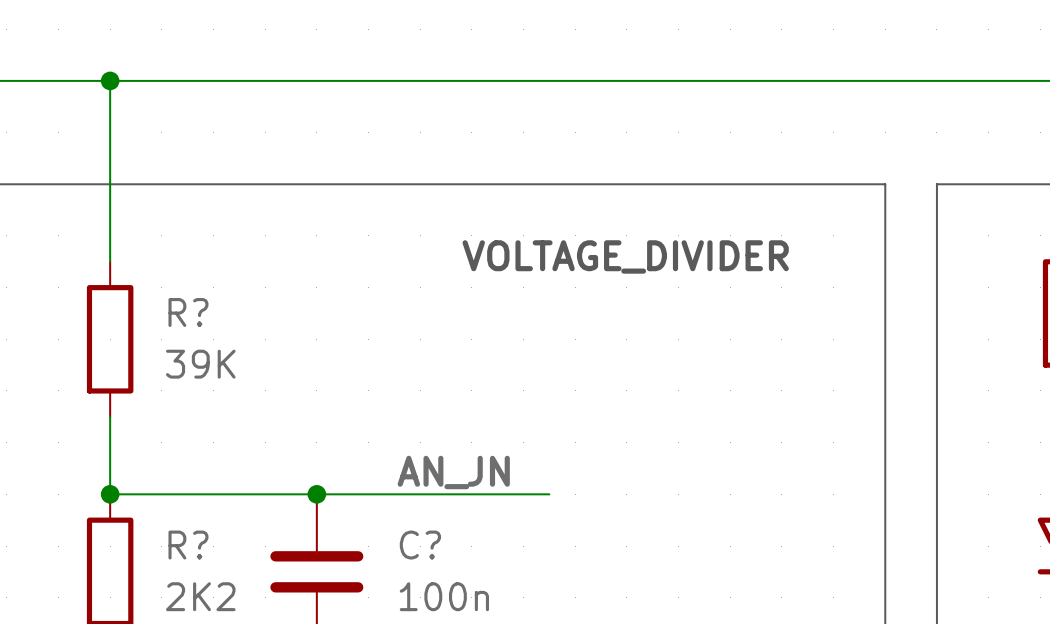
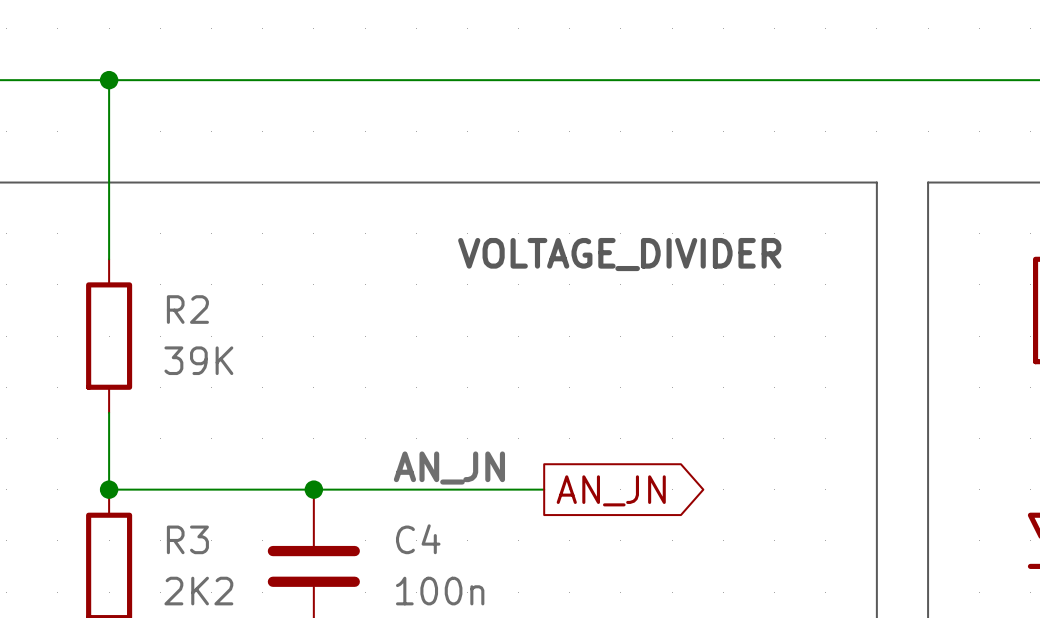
R? name: R? (188, 312) -> R2 (187, 309)
global label: none -> AN_JN (611, 490)
R? name: R? (188, 545) -> R3 (187, 539)
C? name: C? (420, 545) -> C4 (418, 539)

